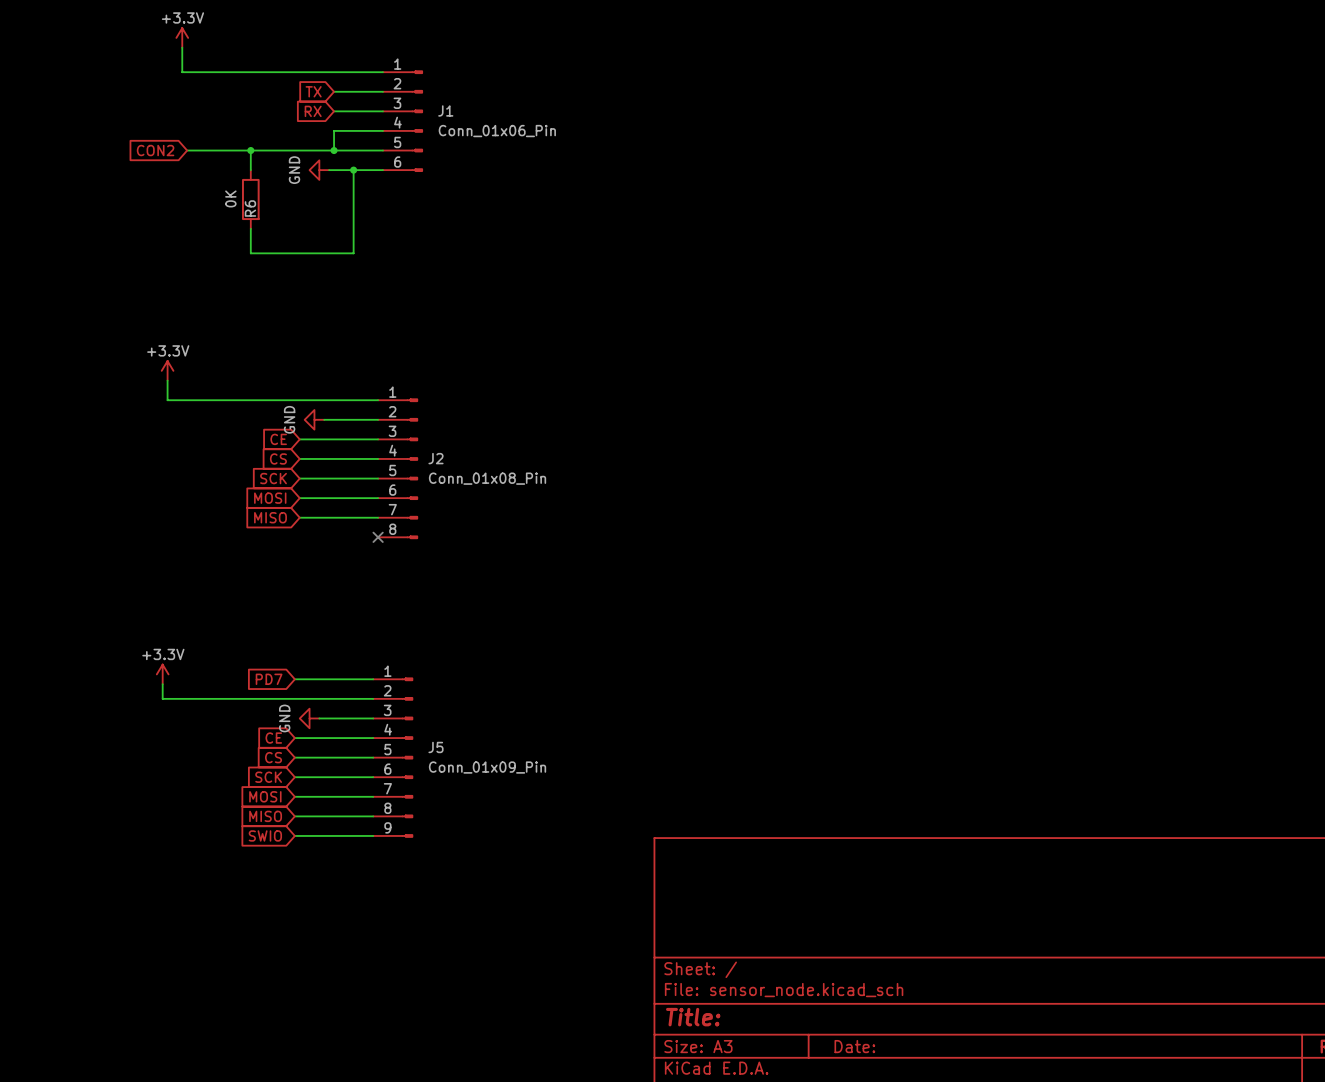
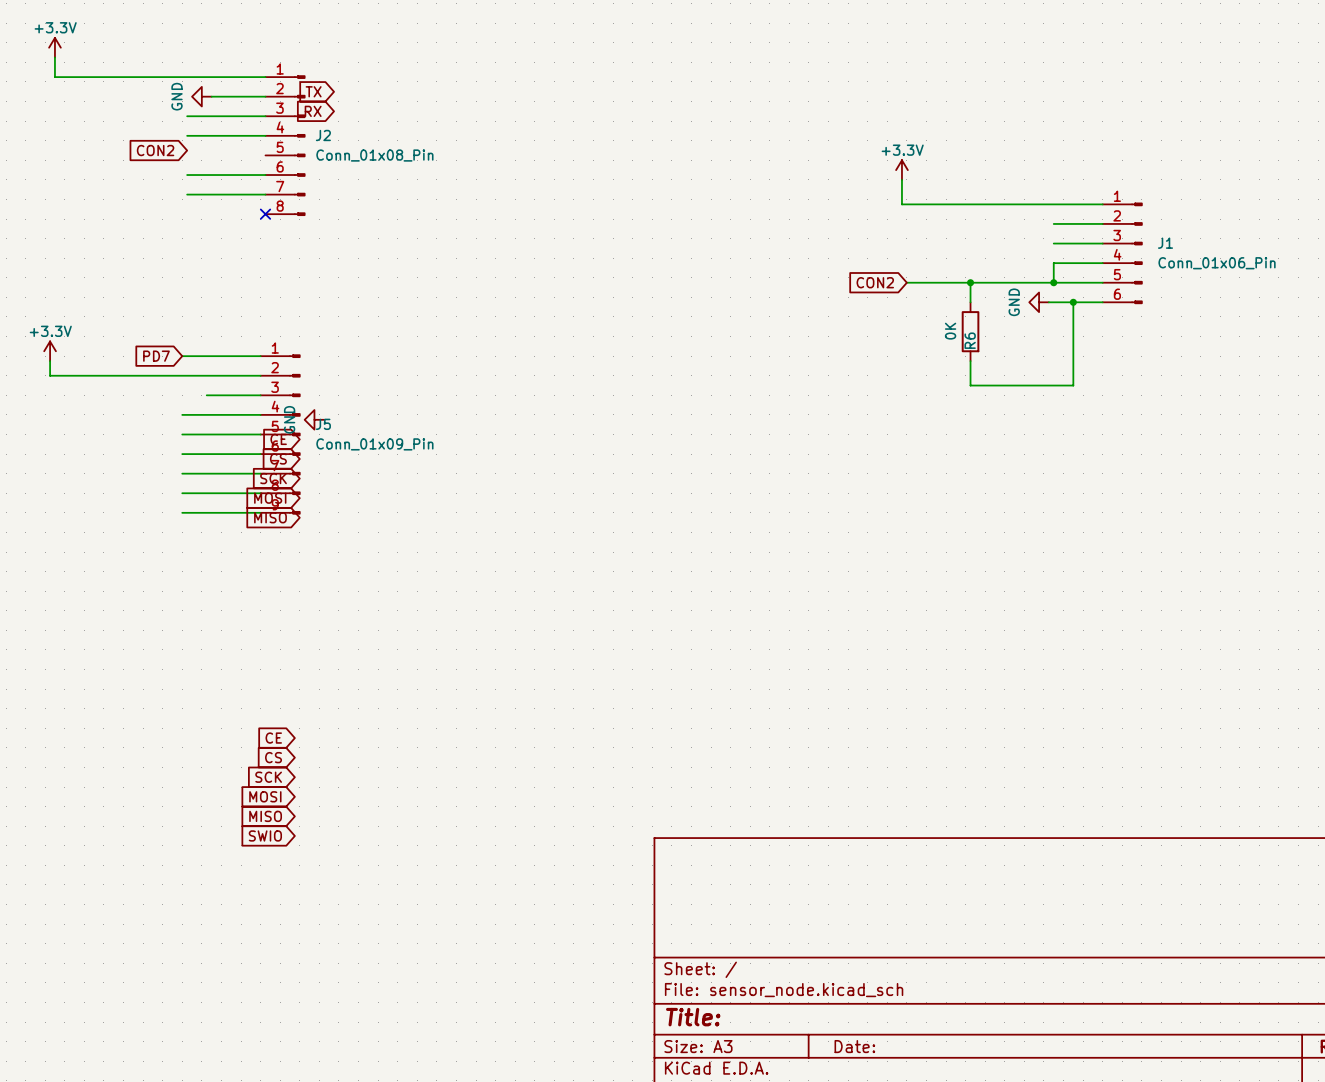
power symbol position: +3.3V (182, 37) -> +3.3V (54, 47)
wire: (182, 47) (182, 72) (383, 72) -> none
wire: none -> (54, 57) (54, 77) (265, 77)
wire: (334, 91) (383, 91) -> none
wire: (334, 111) (383, 111) -> none
wire: none -> (187, 116) (265, 116)
J1 position: (402, 121) -> (1122, 253)
wire: (383, 130) (334, 130) (334, 150) -> none
wire: none -> (187, 135) (265, 135)
wire: (187, 150) (383, 150) -> none
wire: (250, 150) (250, 170) -> none
junction: (250, 150) -> none
junction: (334, 150) -> none
power symbol position: GND (319, 170) -> GND (201, 96)
wire: (329, 170) (383, 170) -> (211, 96) (265, 96)
wire: (353, 170) (353, 253) (250, 253) (250, 228) -> none
junction: (353, 170) -> none
power symbol: none -> +3.3V (901, 170)
wire: none -> (187, 175) (265, 175)
wire: none -> (901, 179) (901, 204) (1102, 204)
wire: none -> (187, 194) (265, 194)
R6 position: (250, 199) -> (970, 331)
no-connect mark: none -> (265, 214)
wire: none -> (1053, 223) (1102, 223)
wire: none -> (1053, 243) (1102, 243)
wire: none -> (1102, 263) (1053, 263) (1053, 282)
global label: none -> CON2 (875, 282)
wire: none -> (906, 282) (1102, 282)
wire: none -> (970, 282) (970, 302)
junction: none -> (970, 282)
junction: none -> (1053, 282)
power symbol: none -> GND (1039, 302)
wire: none -> (1048, 302) (1102, 302)
wire: none -> (1073, 302) (1073, 385) (970, 385) (970, 361)
junction: none -> (1073, 302)
global label: none -> PD7 (156, 356)
wire: none -> (182, 356) (260, 356)
wire: none -> (50, 361) (50, 375) (260, 375)
power symbol position: +3.3V (167, 370) -> +3.3V (50, 351)
wire: (167, 380) (167, 400) (378, 400) -> none
wire: (324, 419) (378, 419) -> (206, 395) (260, 395)
wire: (299, 439) (378, 439) -> (182, 414) (260, 414)
wire: (299, 458) (378, 458) -> (182, 434) (260, 434)
J2 position: (397, 468) -> (285, 145)
wire: (299, 478) (378, 478) -> (182, 454) (260, 454)
wire: (299, 498) (378, 498) -> (182, 473) (260, 473)
wire: none -> (182, 512) (260, 512)
wire: (299, 517) (378, 517) -> (182, 493) (260, 493)
no-connect mark: (378, 537) -> none
power symbol: +3.3V (162, 674) -> none
global label: PD7 (269, 679) -> none
wire: (294, 679) (373, 679) -> none
wire: (162, 684) (162, 698) (373, 698) -> none
power symbol: GND (309, 718) -> none
wire: (319, 718) (373, 718) -> none
wire: (294, 738) (373, 738) -> none
wire: (294, 757) (373, 757) -> none
J5 position: (393, 757) -> (280, 434)
wire: (294, 777) (373, 777) -> none
wire: (294, 796) (373, 796) -> none
wire: (294, 816) (373, 816) -> none
wire: (294, 835) (373, 835) -> none

